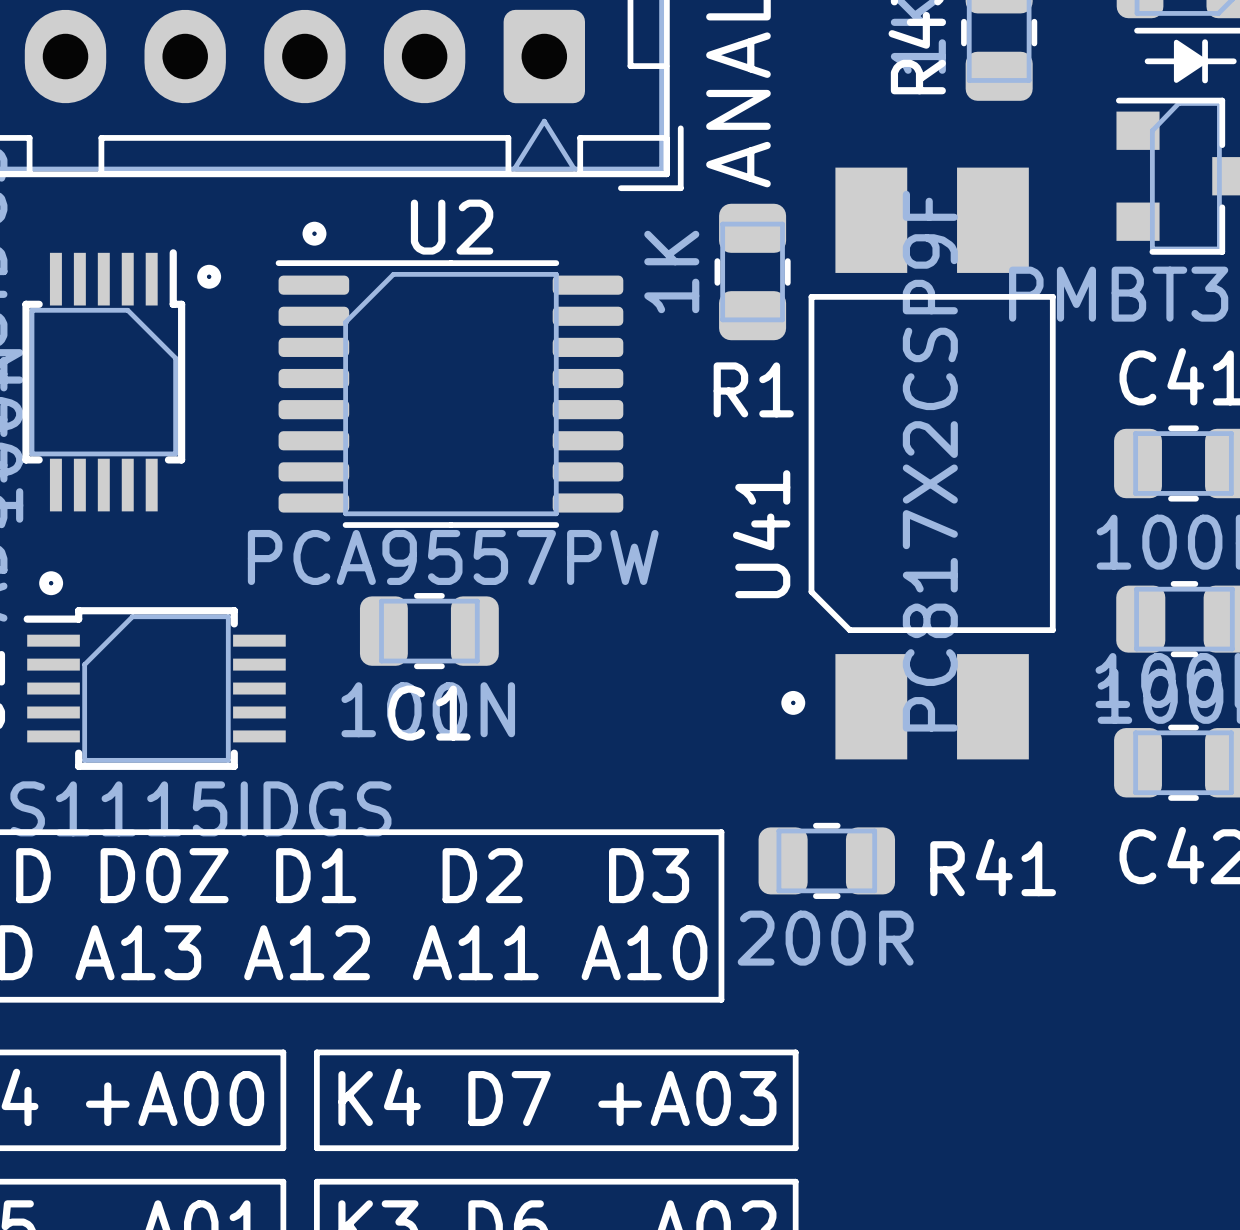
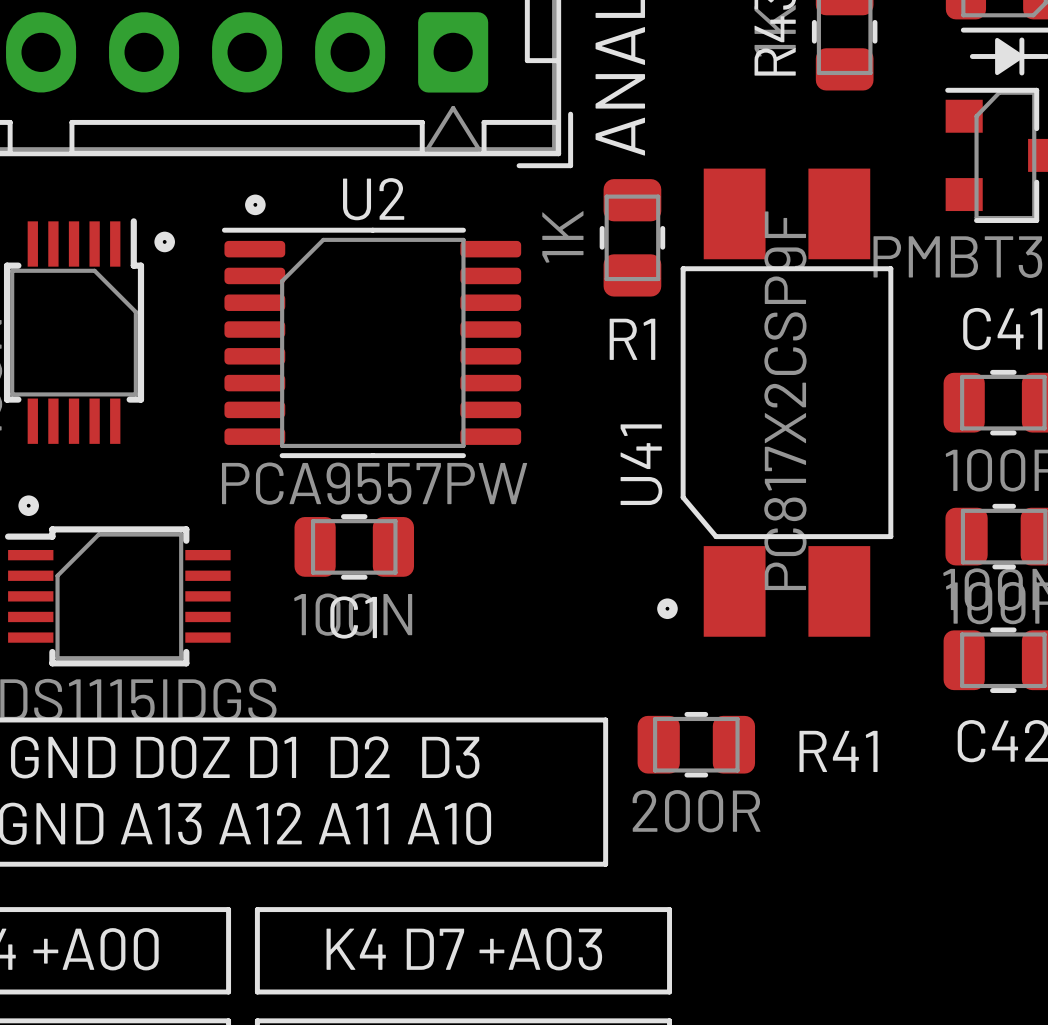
U41 footprint: [808, 167, 1056, 760] -> [680, 168, 894, 637]

